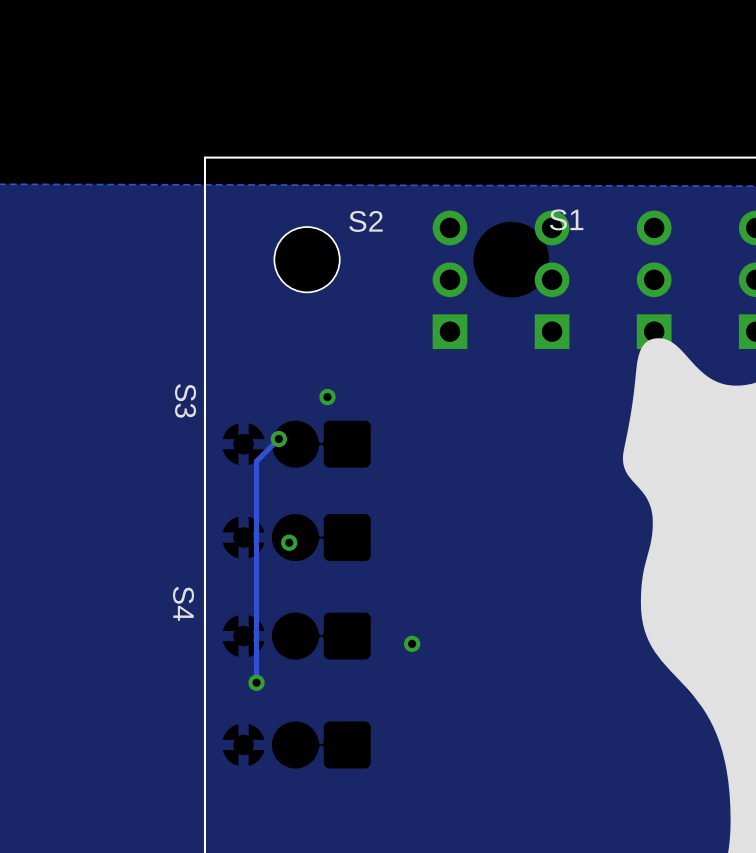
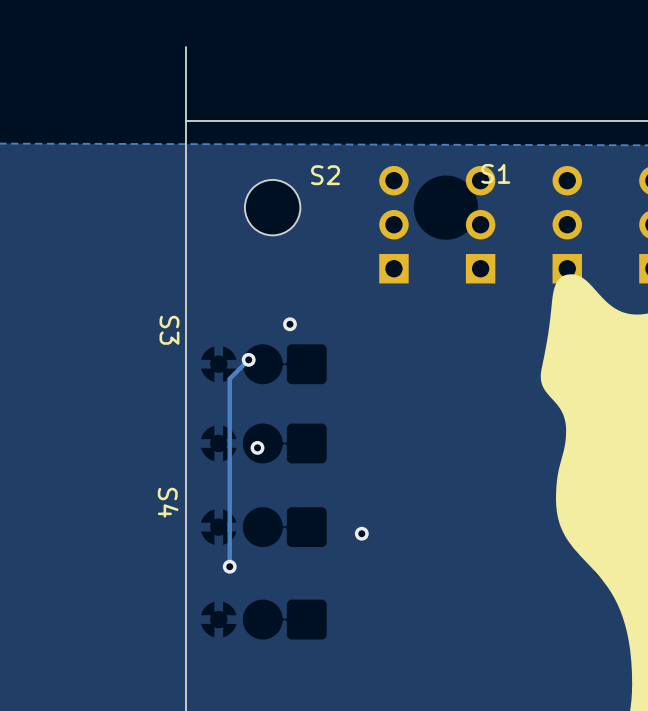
board edge: none -> (185, 47) (185, 120)

